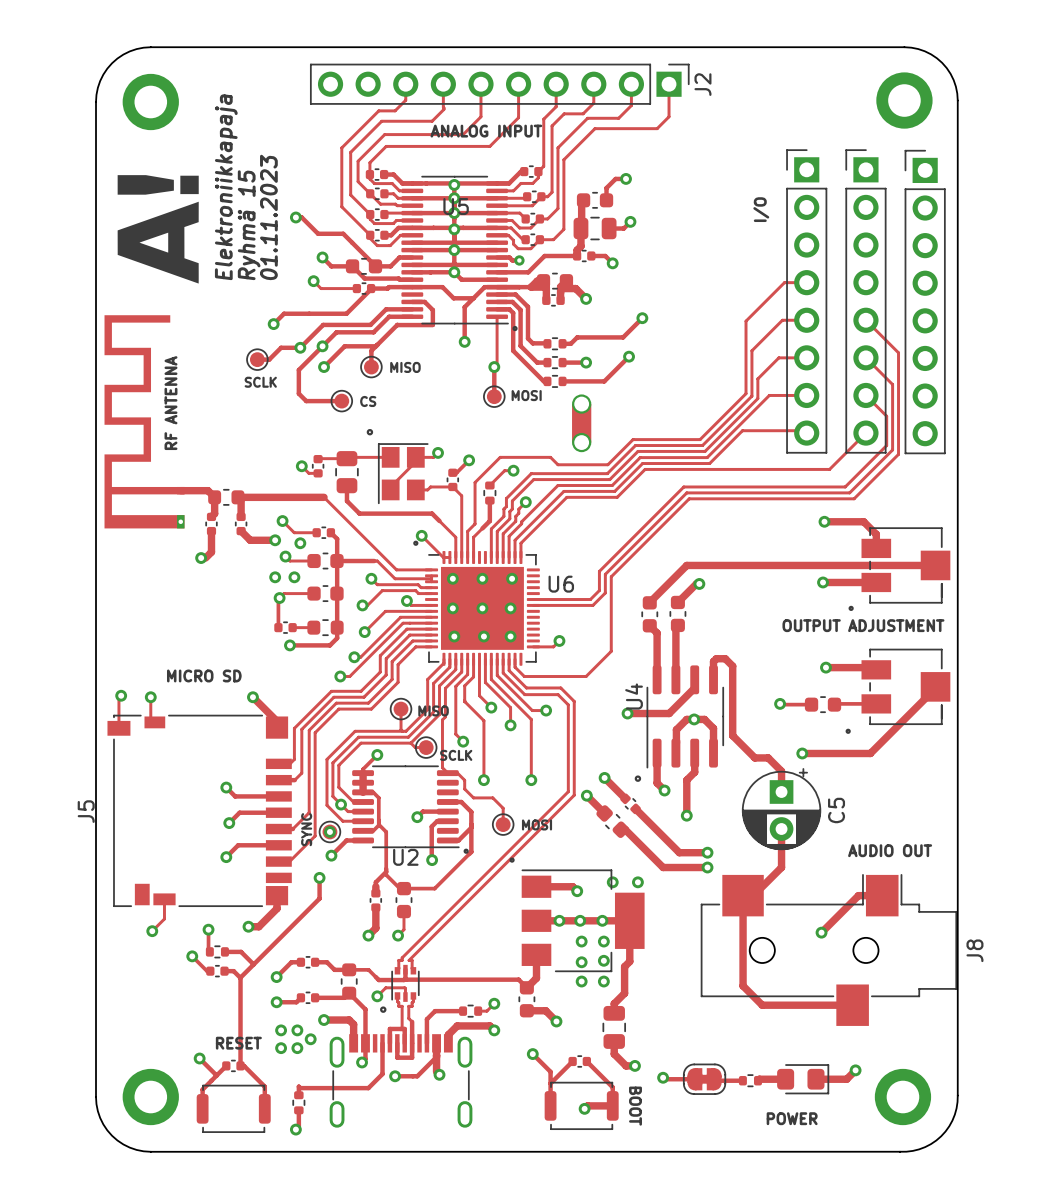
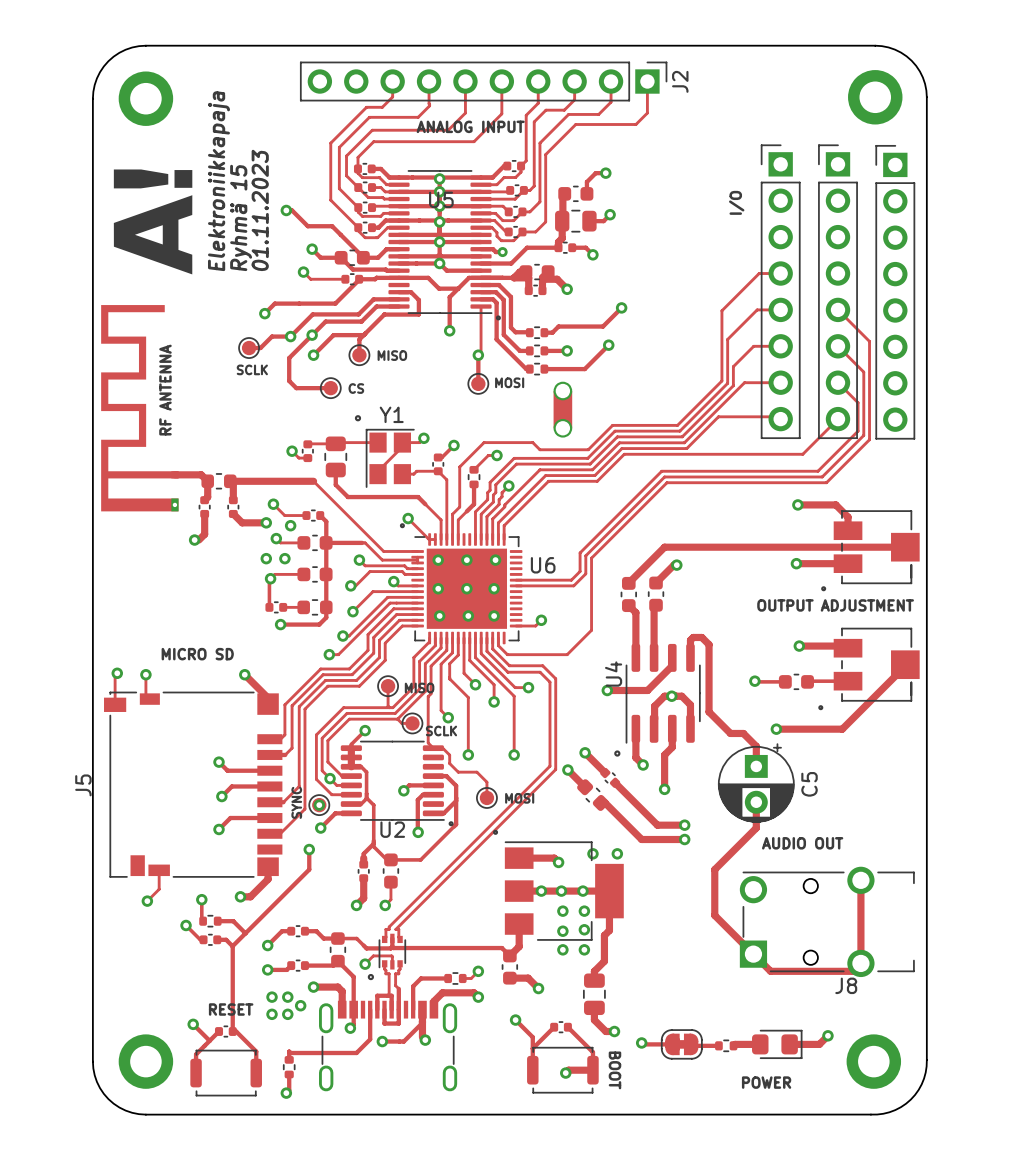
Y1 name: none -> Y1 (391, 414)
text position: AUDIO OUT (890, 850) -> AUDIO OUT (802, 843)
track: (781, 855) (781, 867) (753, 895) (743, 895) (743, 985) (762, 1005) (852, 1005) -> (756, 828) (714, 869) (714, 915) (770, 971) (853, 971) (860, 963) (860, 880)
J8 footprint: [700, 874, 958, 1026] -> [739, 866, 915, 978]
track: (882, 895) (858, 895) (821, 932) -> none
via: (821, 932) -> none
J8 name position: J8 (974, 950) -> J8 (846, 985)

